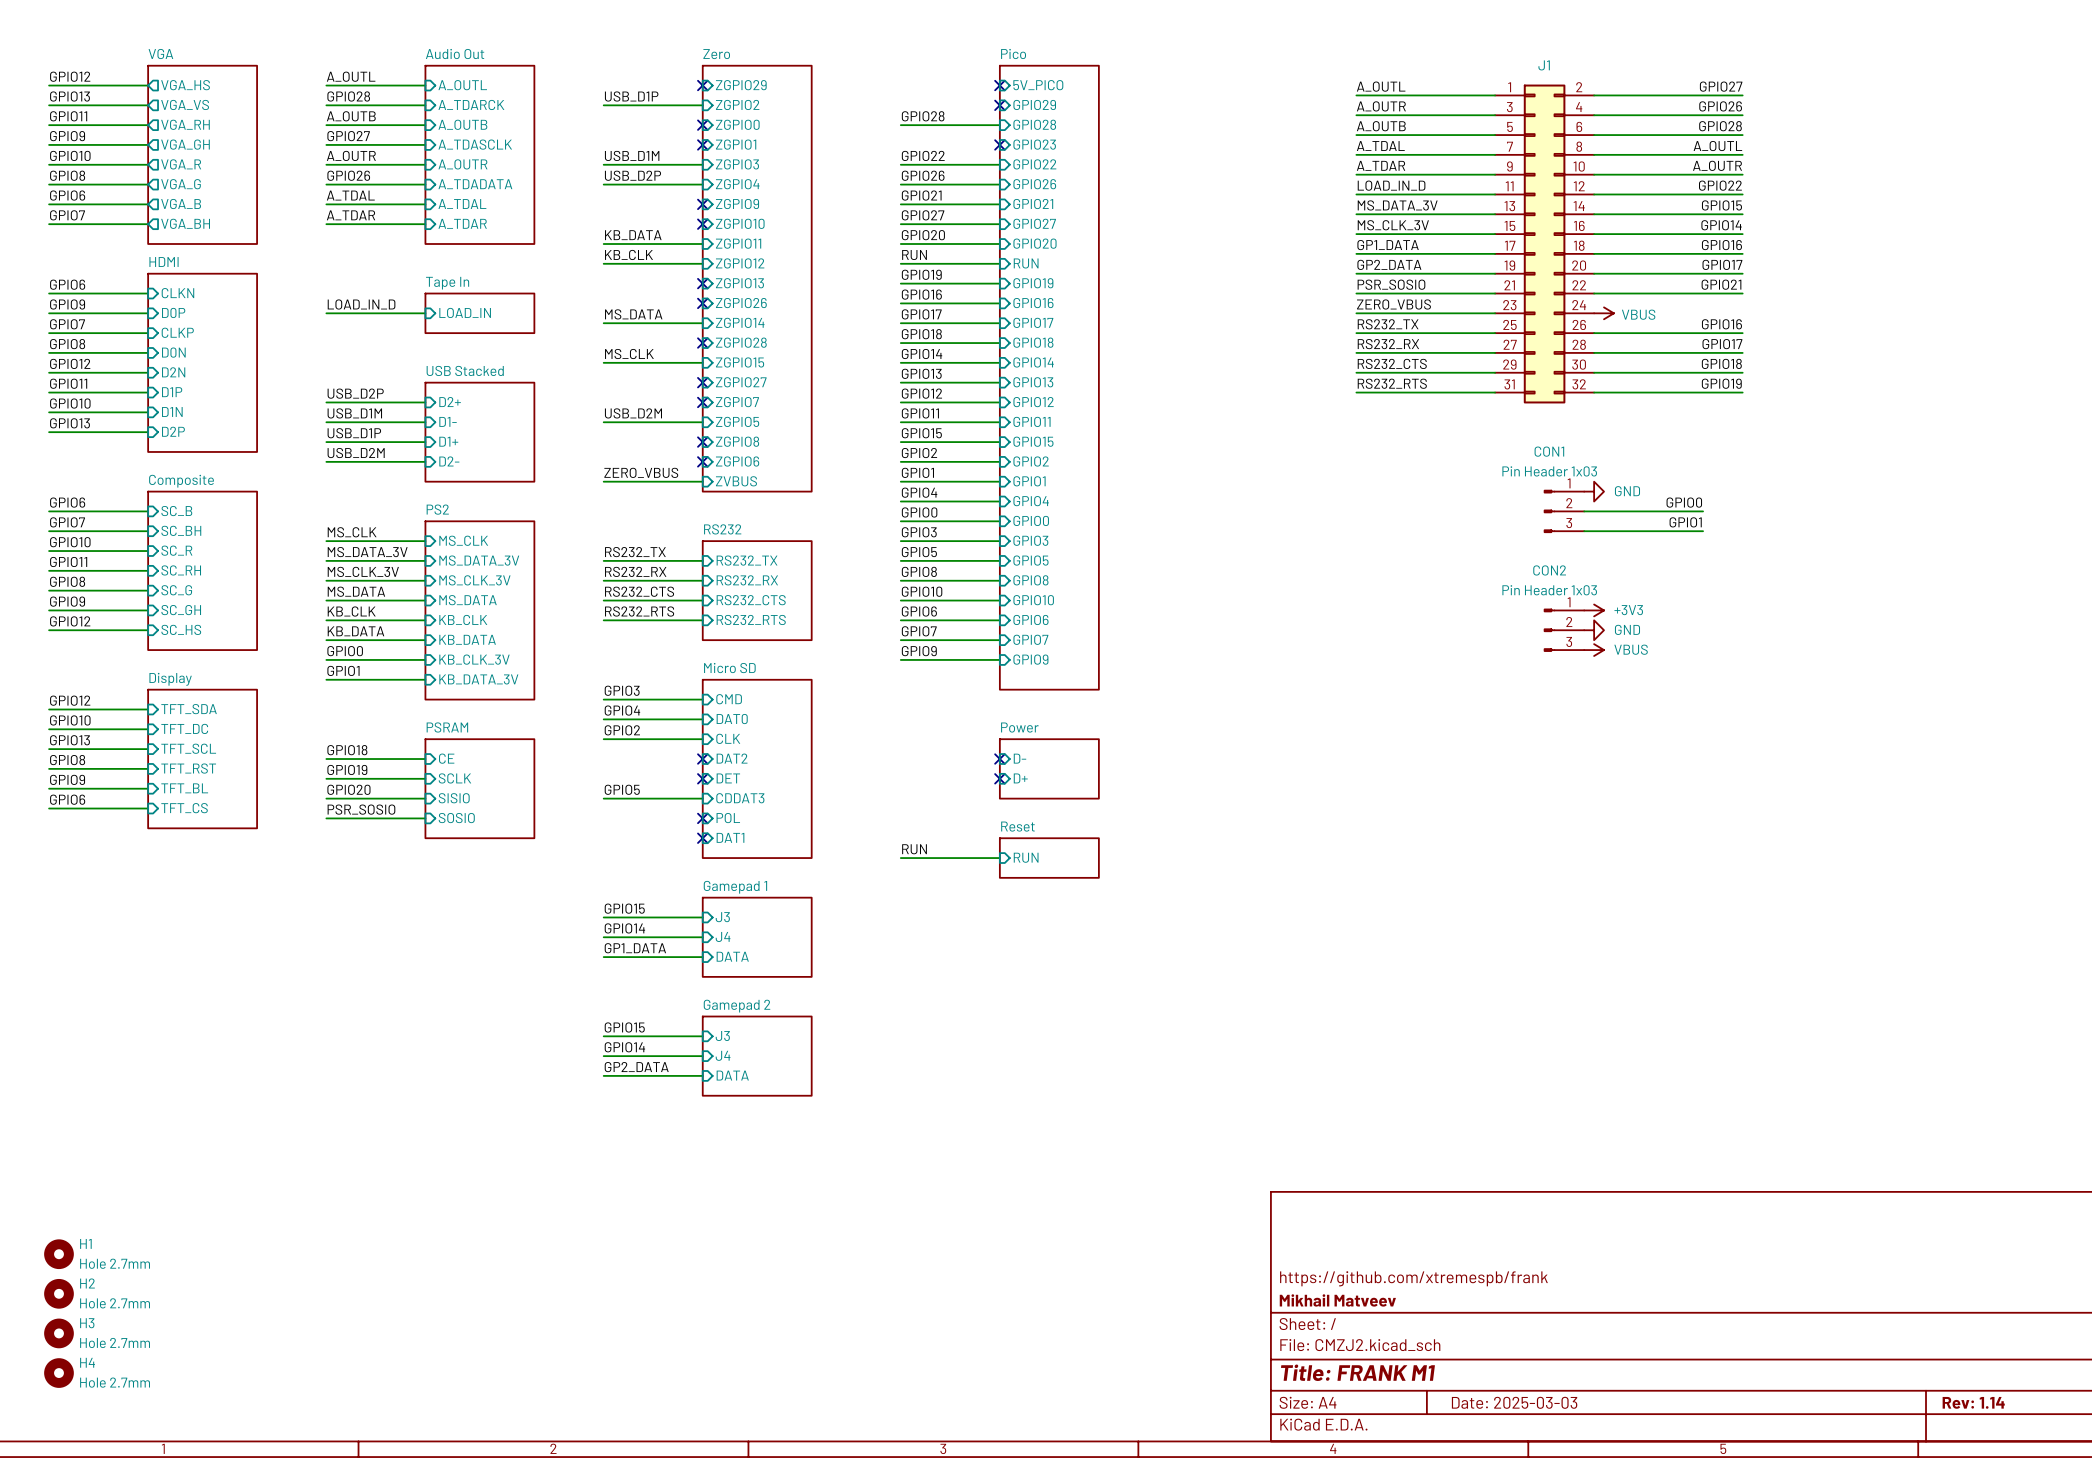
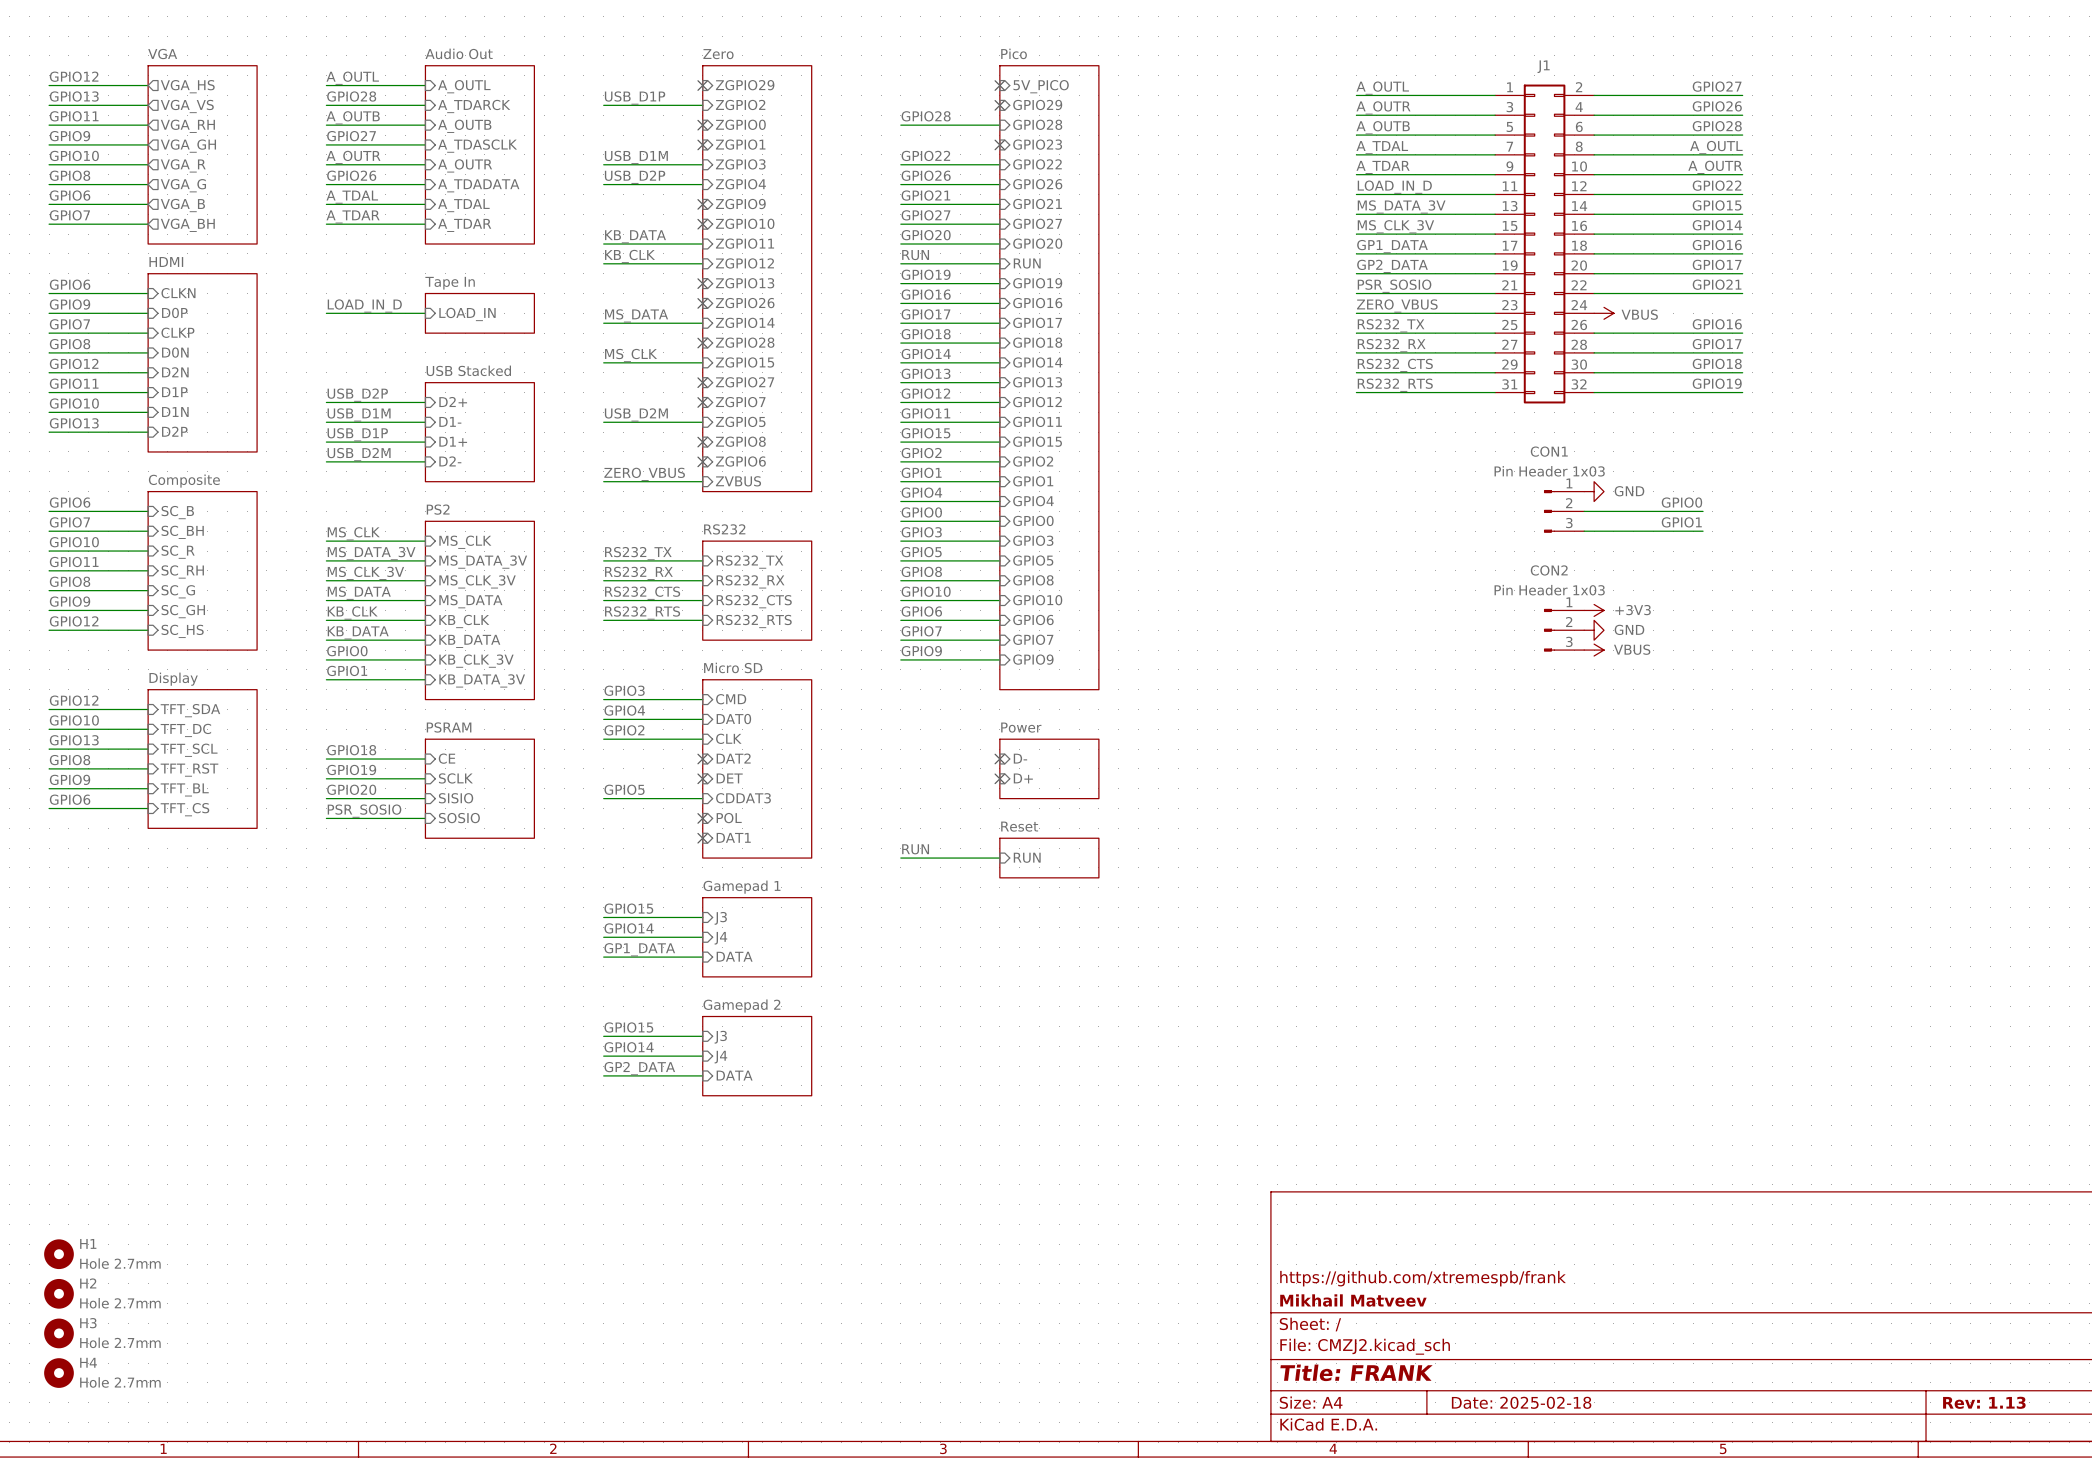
title block: Title: FRANK M1 (1357, 1372) -> Title: FRANK (1356, 1372)
title block: Date: 2025-03-03 (1514, 1402) -> Date: 2025-02-18 (1521, 1402)
title block: Rev: 1.14 (1973, 1402) -> Rev: 1.13 (1984, 1402)

